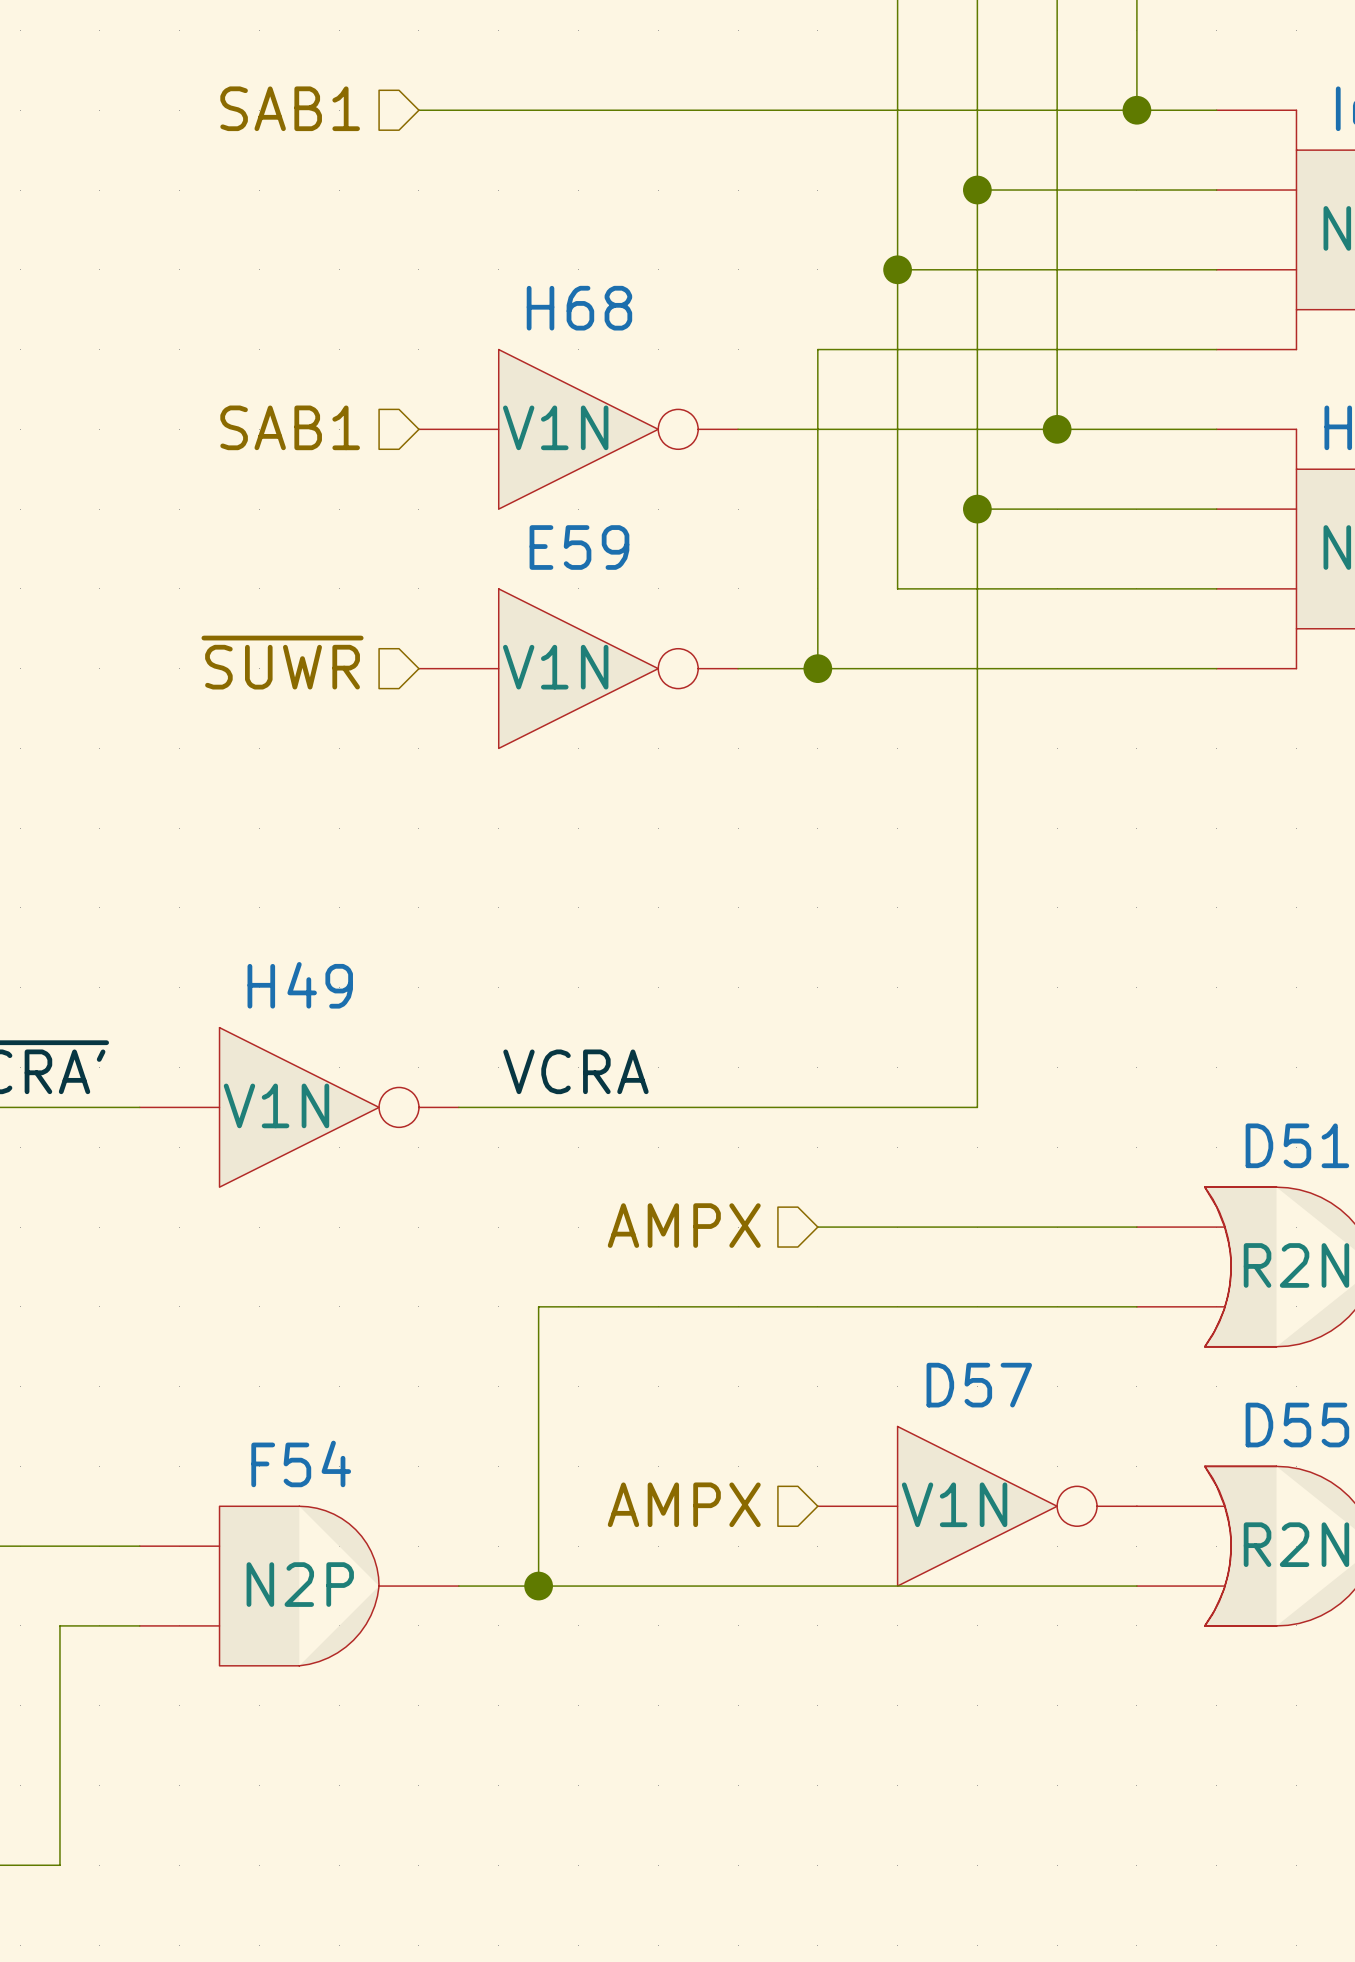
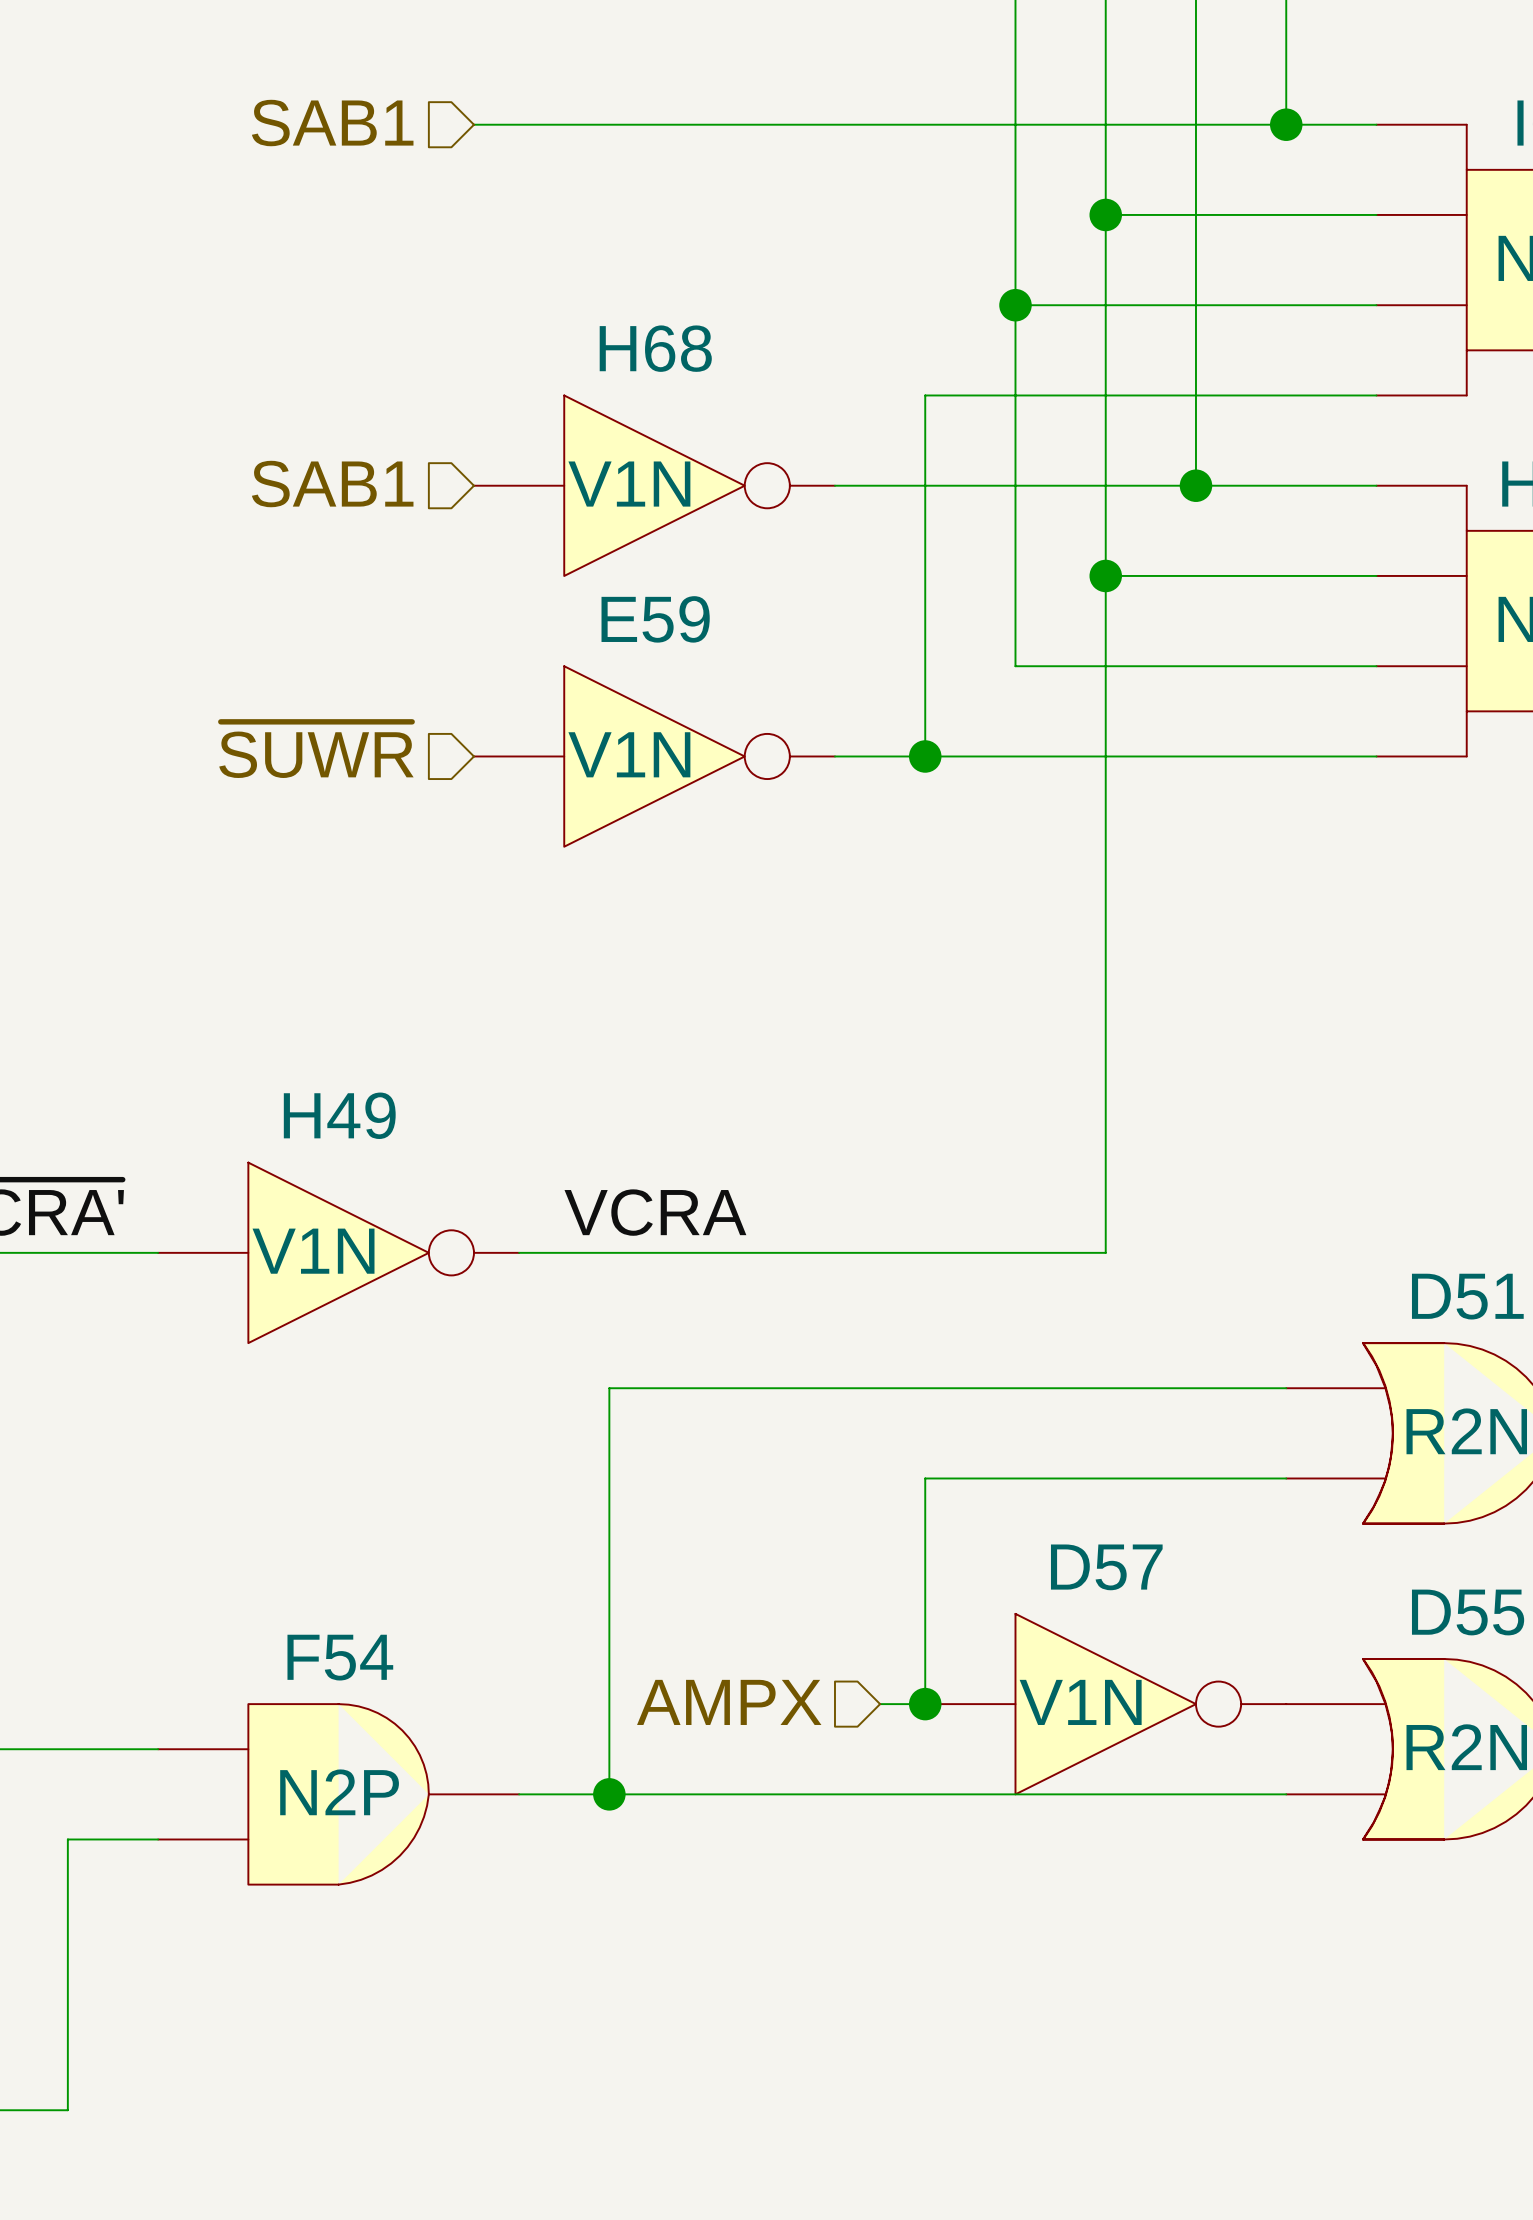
hierarchical label: AMPX (684, 1225) -> none
wire: (538, 1306) (817, 1306) -> (609, 1478) (609, 1388) (925, 1388)
wire: none -> (925, 1478) (925, 1704) (880, 1704)
hierarchical label position: AMPX (684, 1504) -> AMPX (729, 1702)
junction: none -> (925, 1704)

